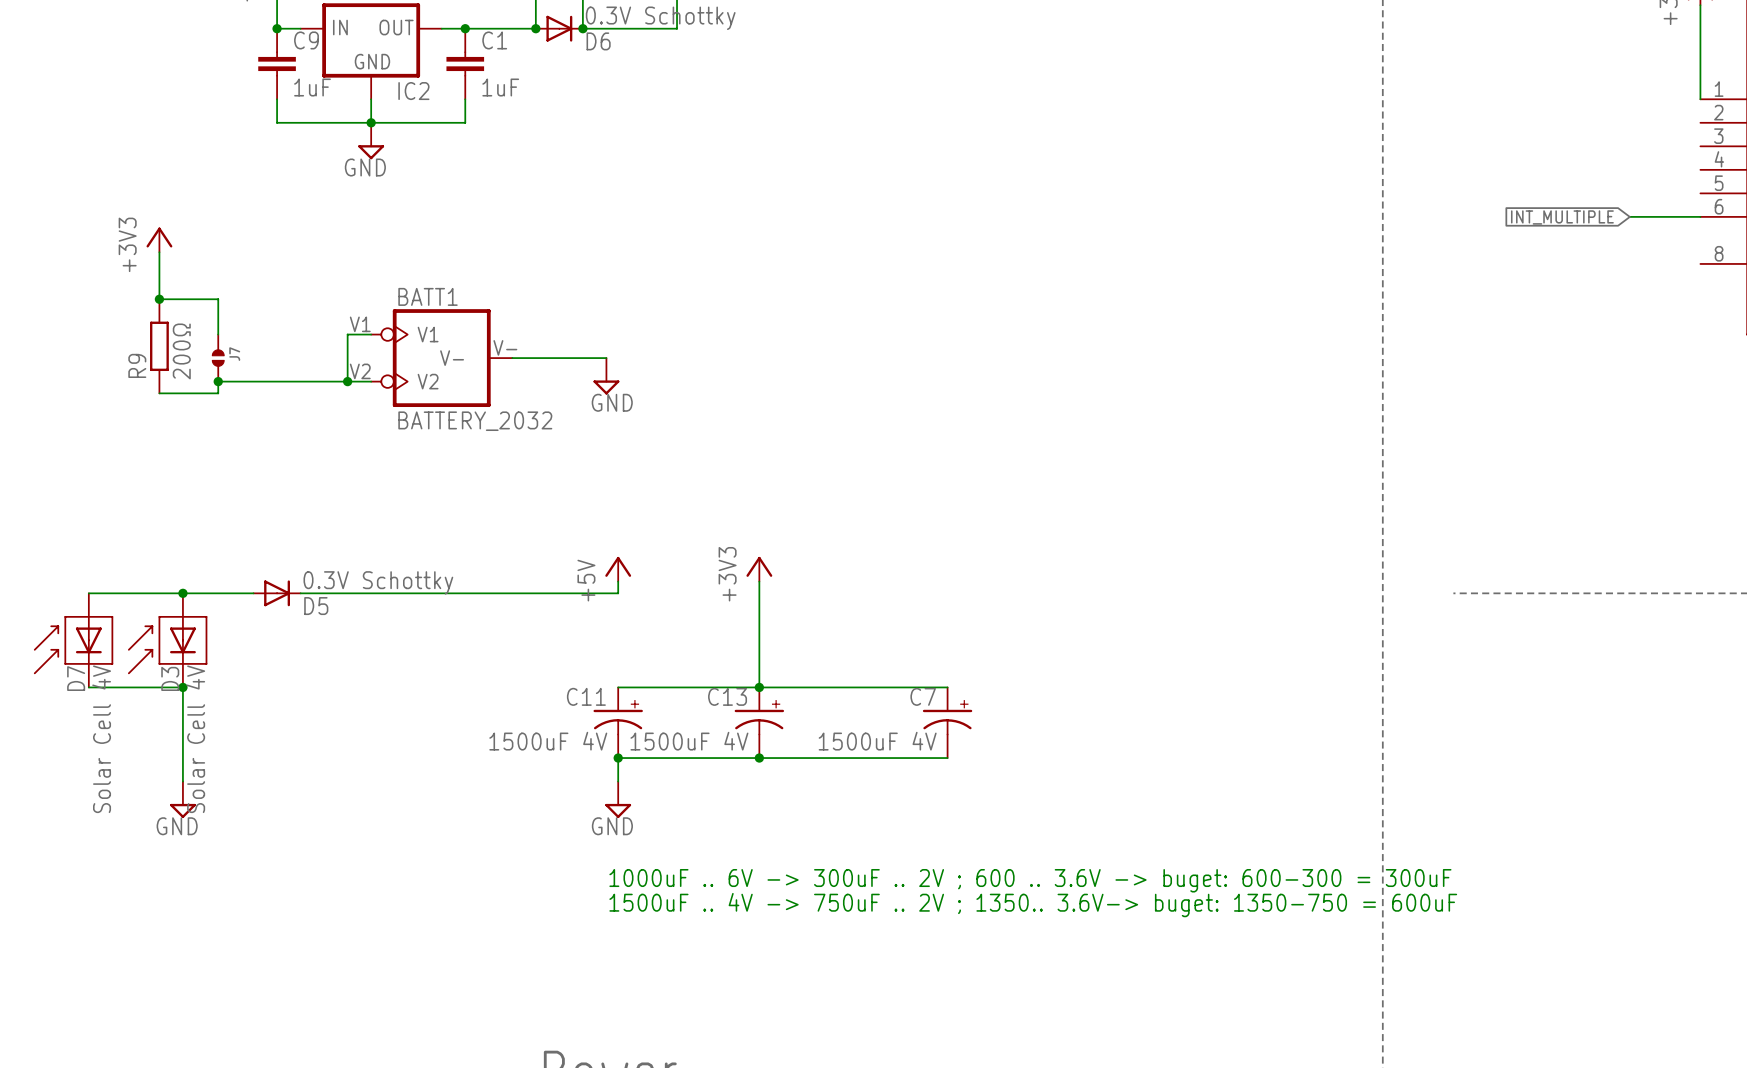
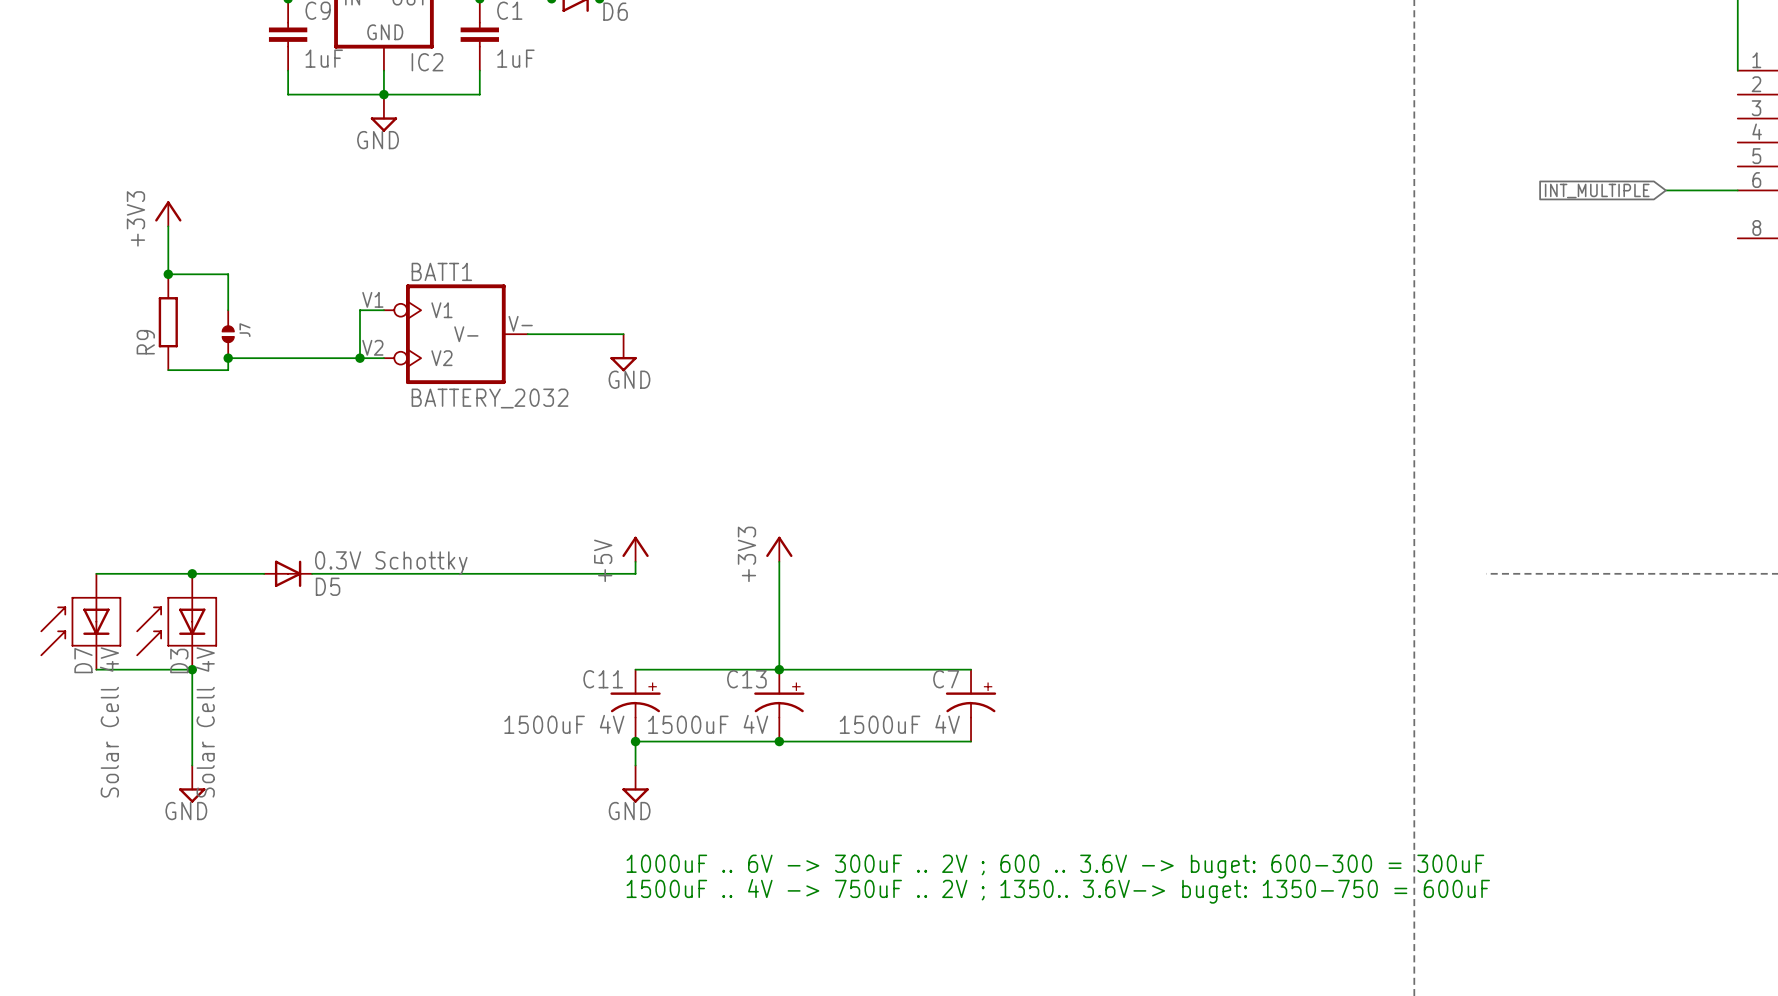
R9 value: 200Ω (181, 351) -> none

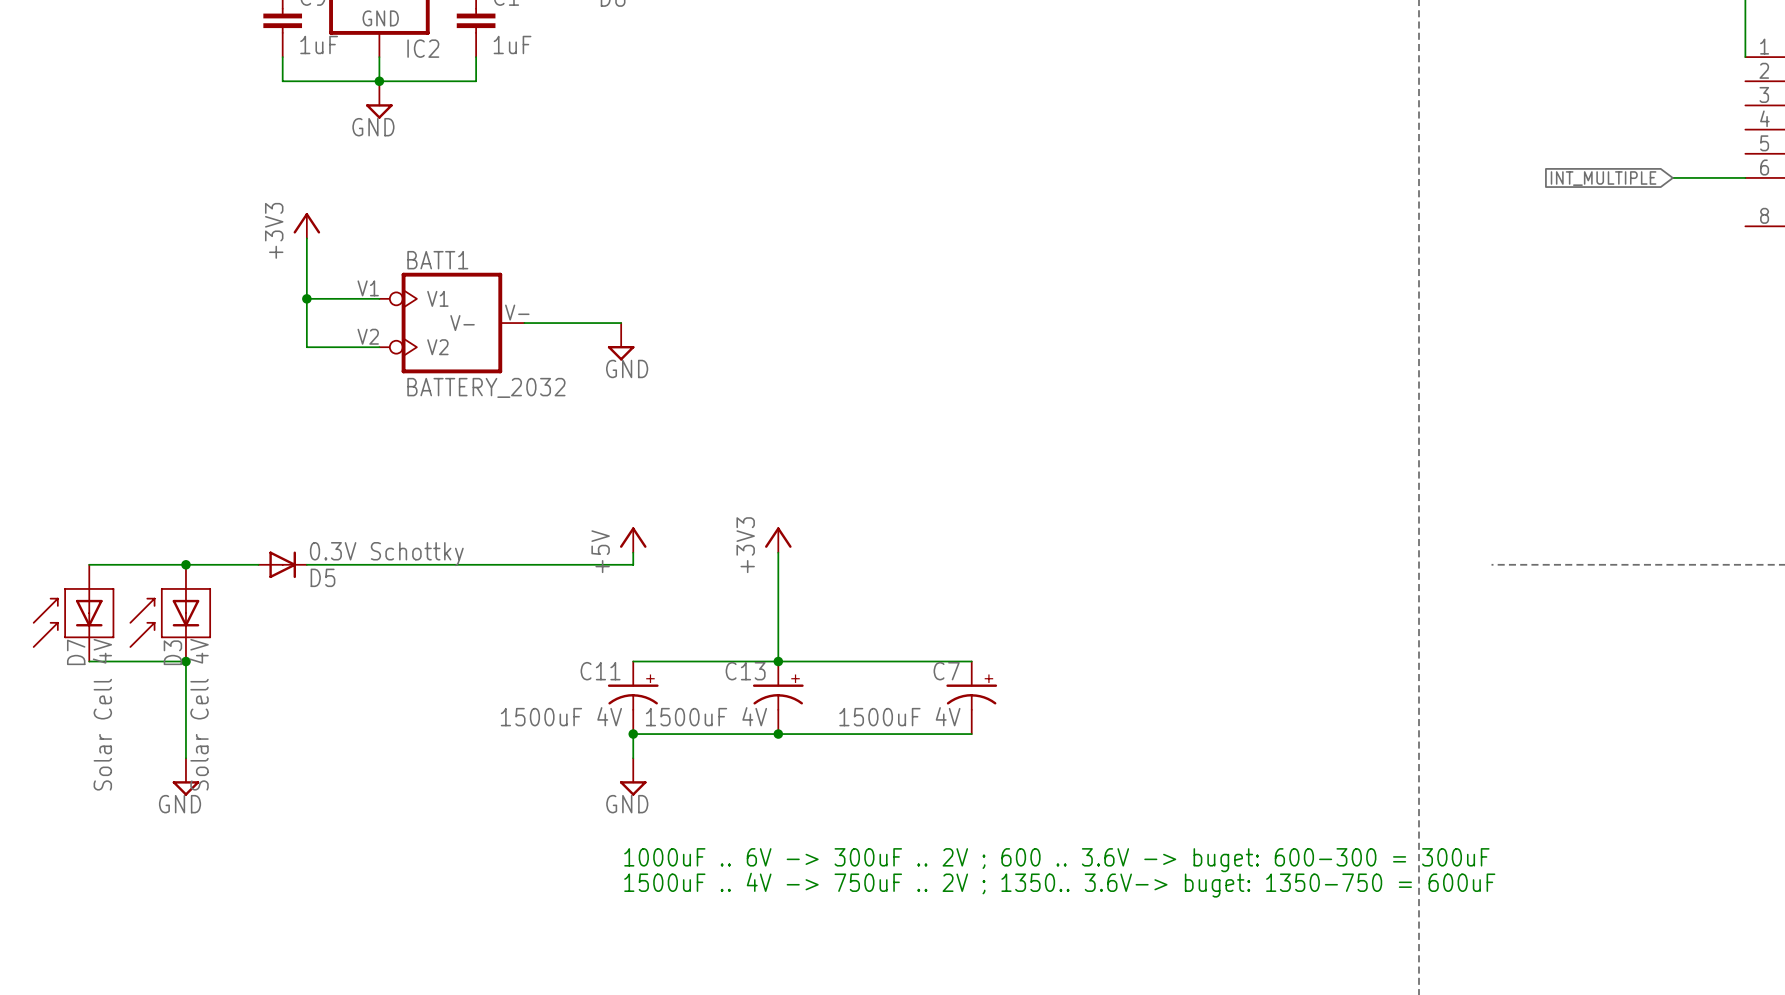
power symbol position: +3V3 (168, 213) -> +3V3 (306, 225)
wire: (168, 226) (168, 274) (228, 274) (228, 310) -> none
junction: (168, 274) -> none
junction: none -> (306, 298)
wire: (359, 310) (359, 358) -> (355, 298) (306, 298)
R9: (168, 322) -> none
J7: (228, 334) -> none
junction: (228, 358) -> none
wire: (312, 358) (228, 358) (228, 370) (168, 370) -> (306, 347) (306, 238)
junction: (359, 358) -> none

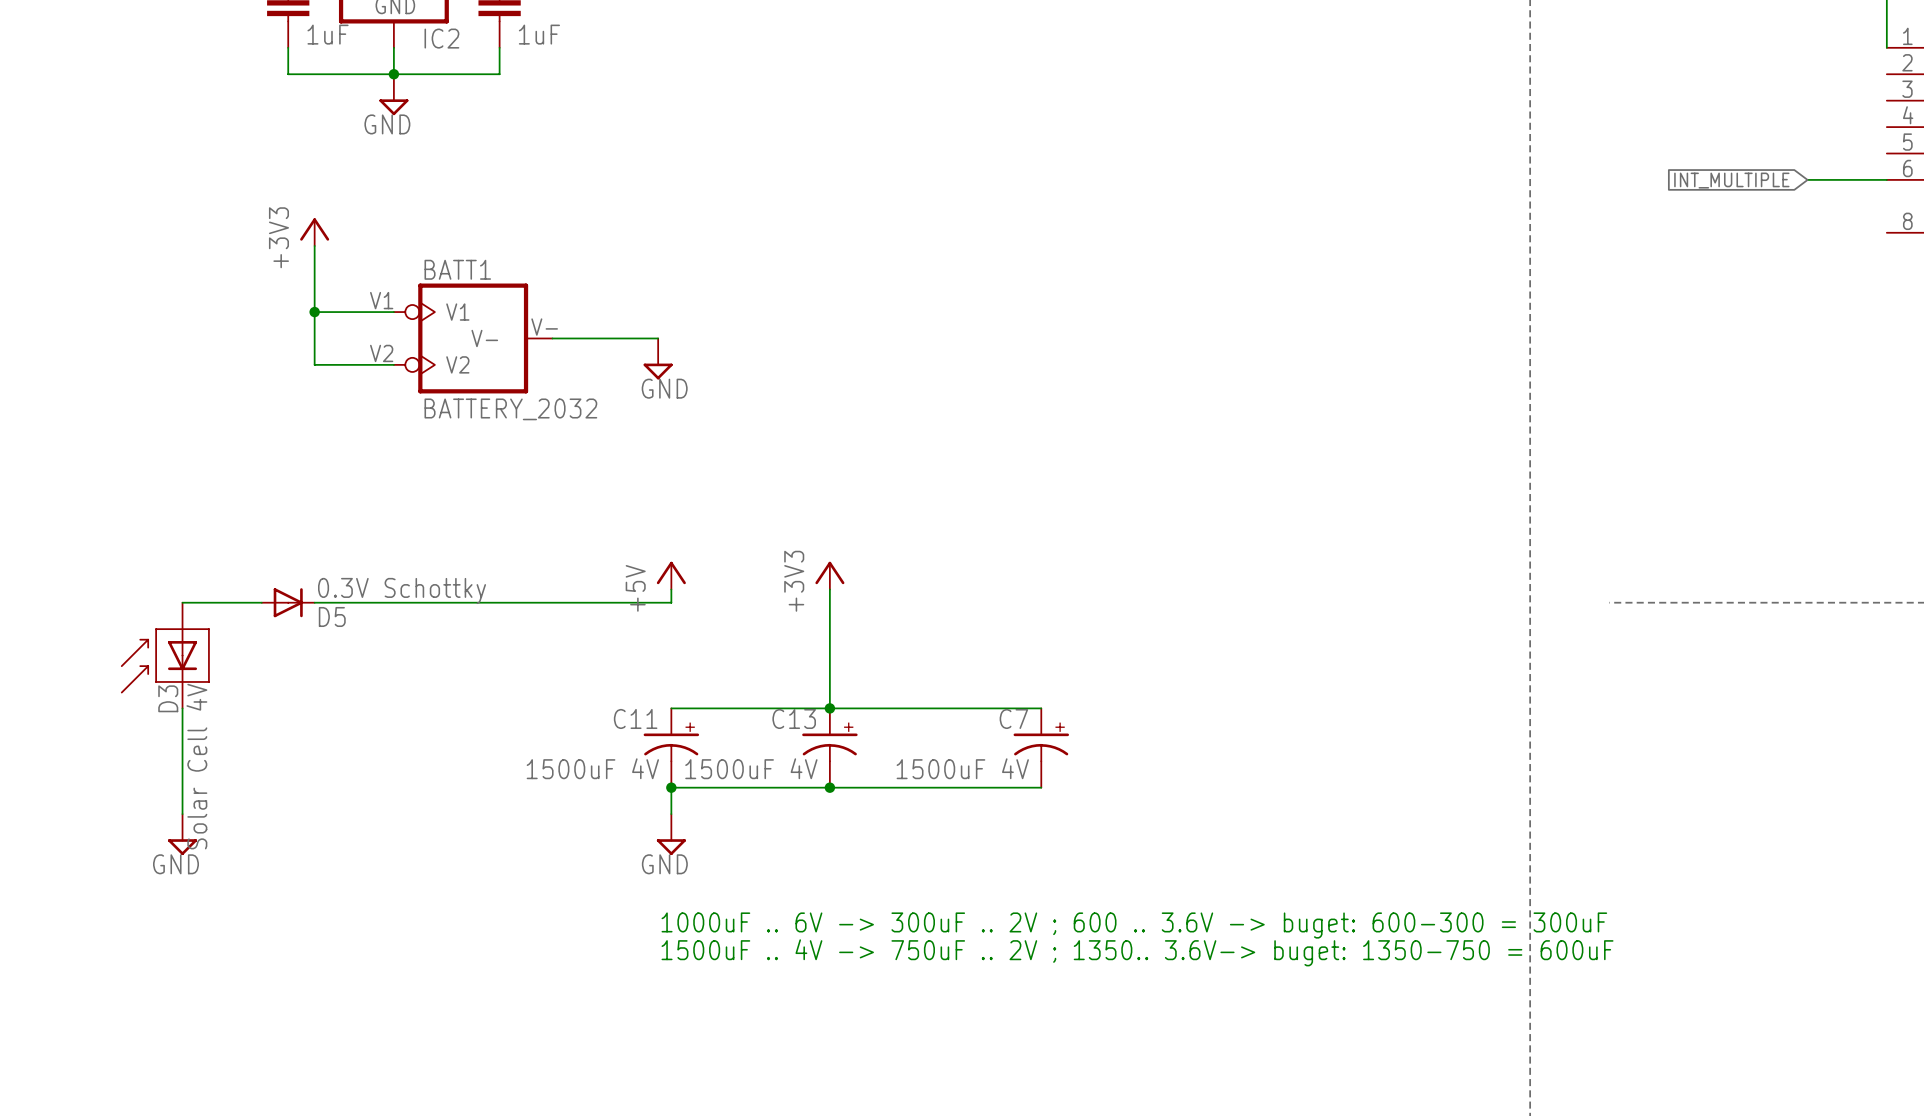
wire: (89, 564) (185, 564) -> none
junction: (185, 564) -> none
D7: Solar Cell 4V (73, 613) -> none
wire: (89, 661) (185, 661) -> none
junction: (185, 661) -> none

